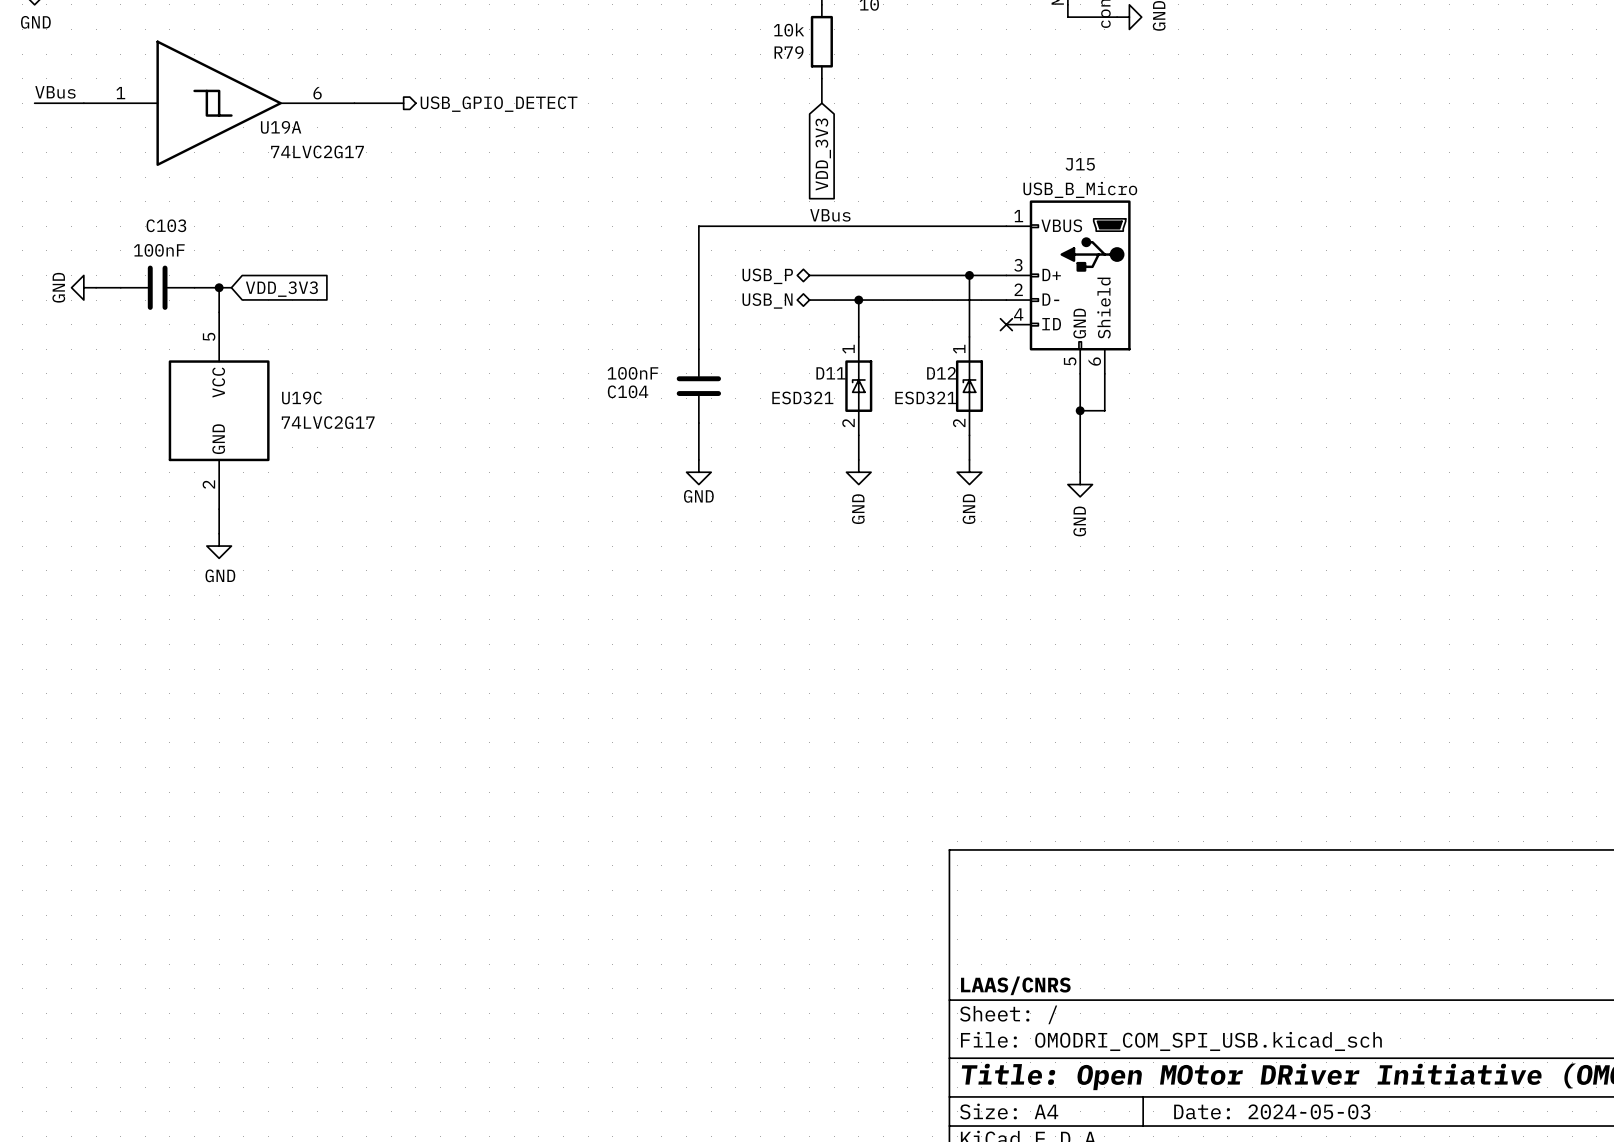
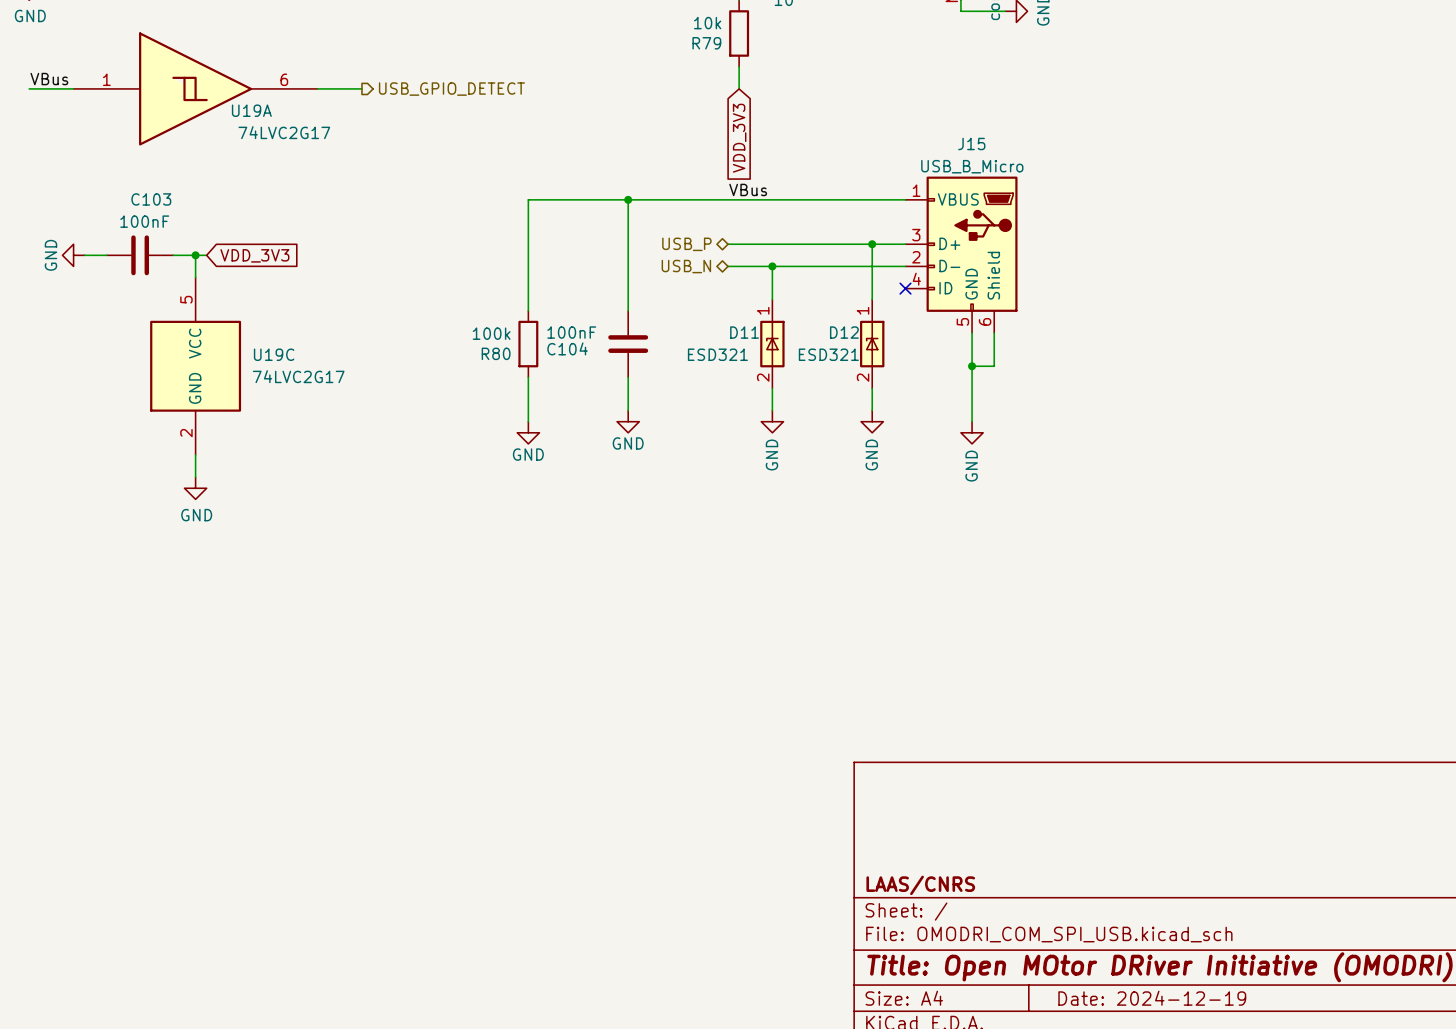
wire: none -> (628, 199) (528, 199) (528, 310)
junction: none -> (628, 199)
R80: none -> 100k (528, 344)
wire: none -> (528, 377) (528, 421)
power symbol: none -> GND (528, 432)
title block: Date: 2024-05-03 (1272, 1111) -> Date: 2024-12-19 (1152, 998)

